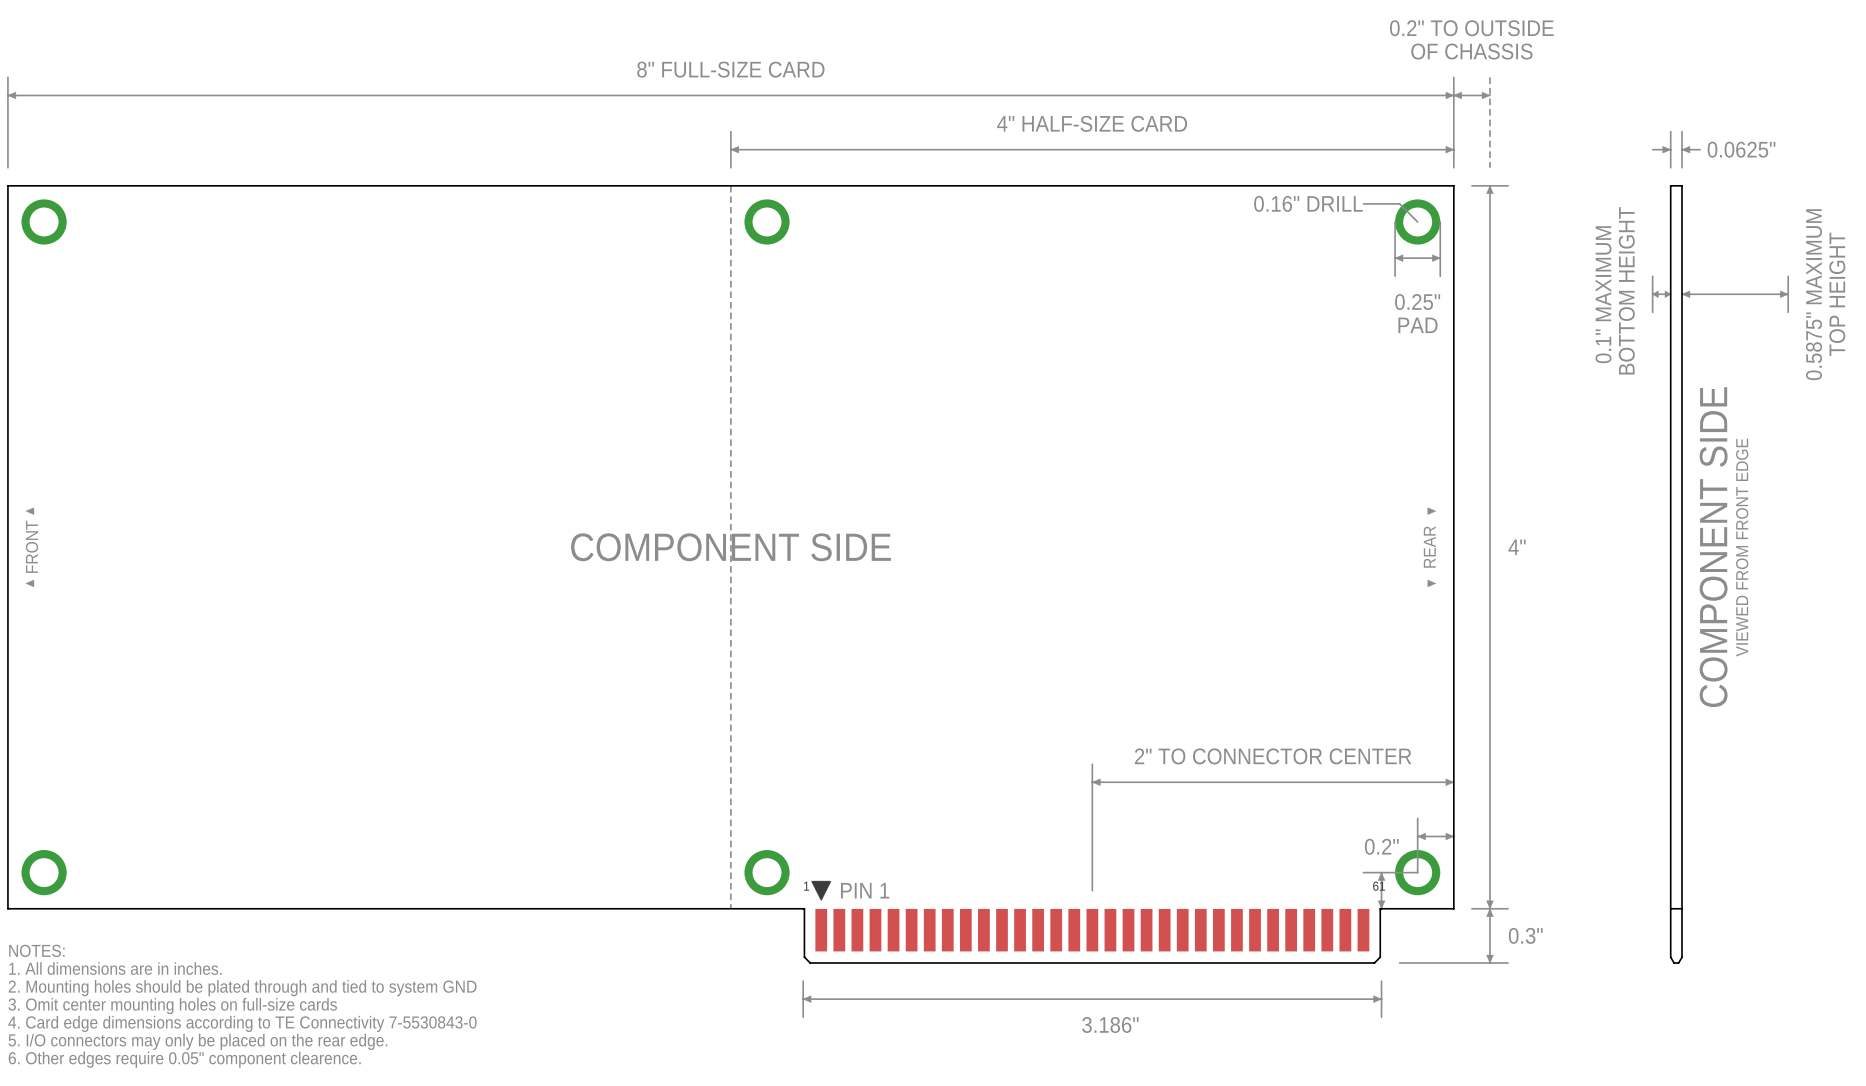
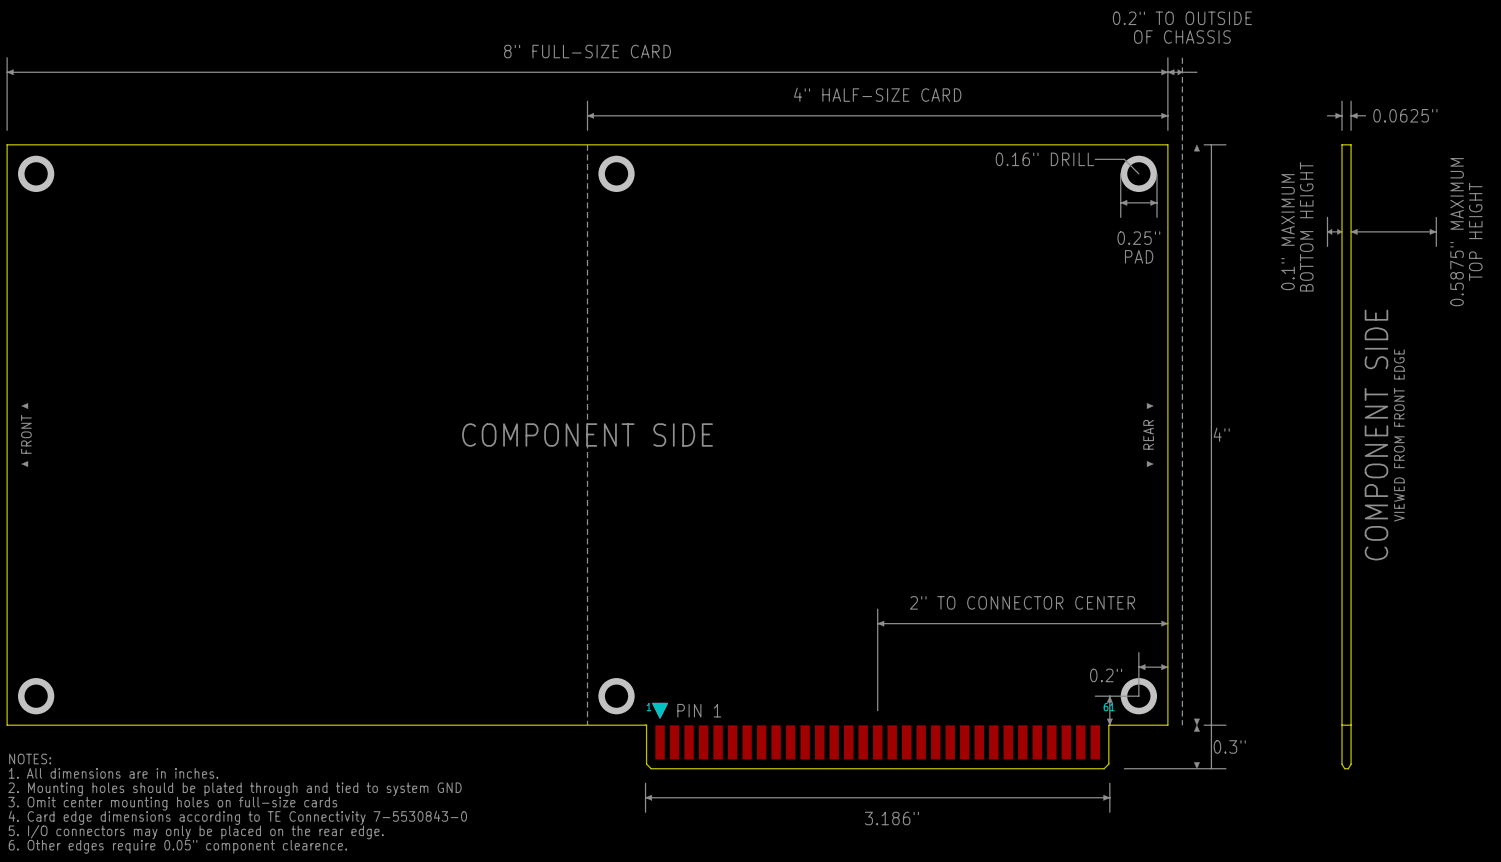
line: (1489, 77) (1489, 167) -> none
drawing: none -> [1177, 69, 1183, 76]
drawing: [1481, 91, 1491, 100] -> none
line: (1471, 185) (1499, 185) -> none
line: (1489, 185) (1489, 962) -> none
line: none -> (1225, 144) (1211, 144) (1211, 768) (1225, 768)
line: (1471, 908) (1499, 908) -> (1182, 725) (1182, 57)
line: none -> (1211, 725) (1225, 725)

